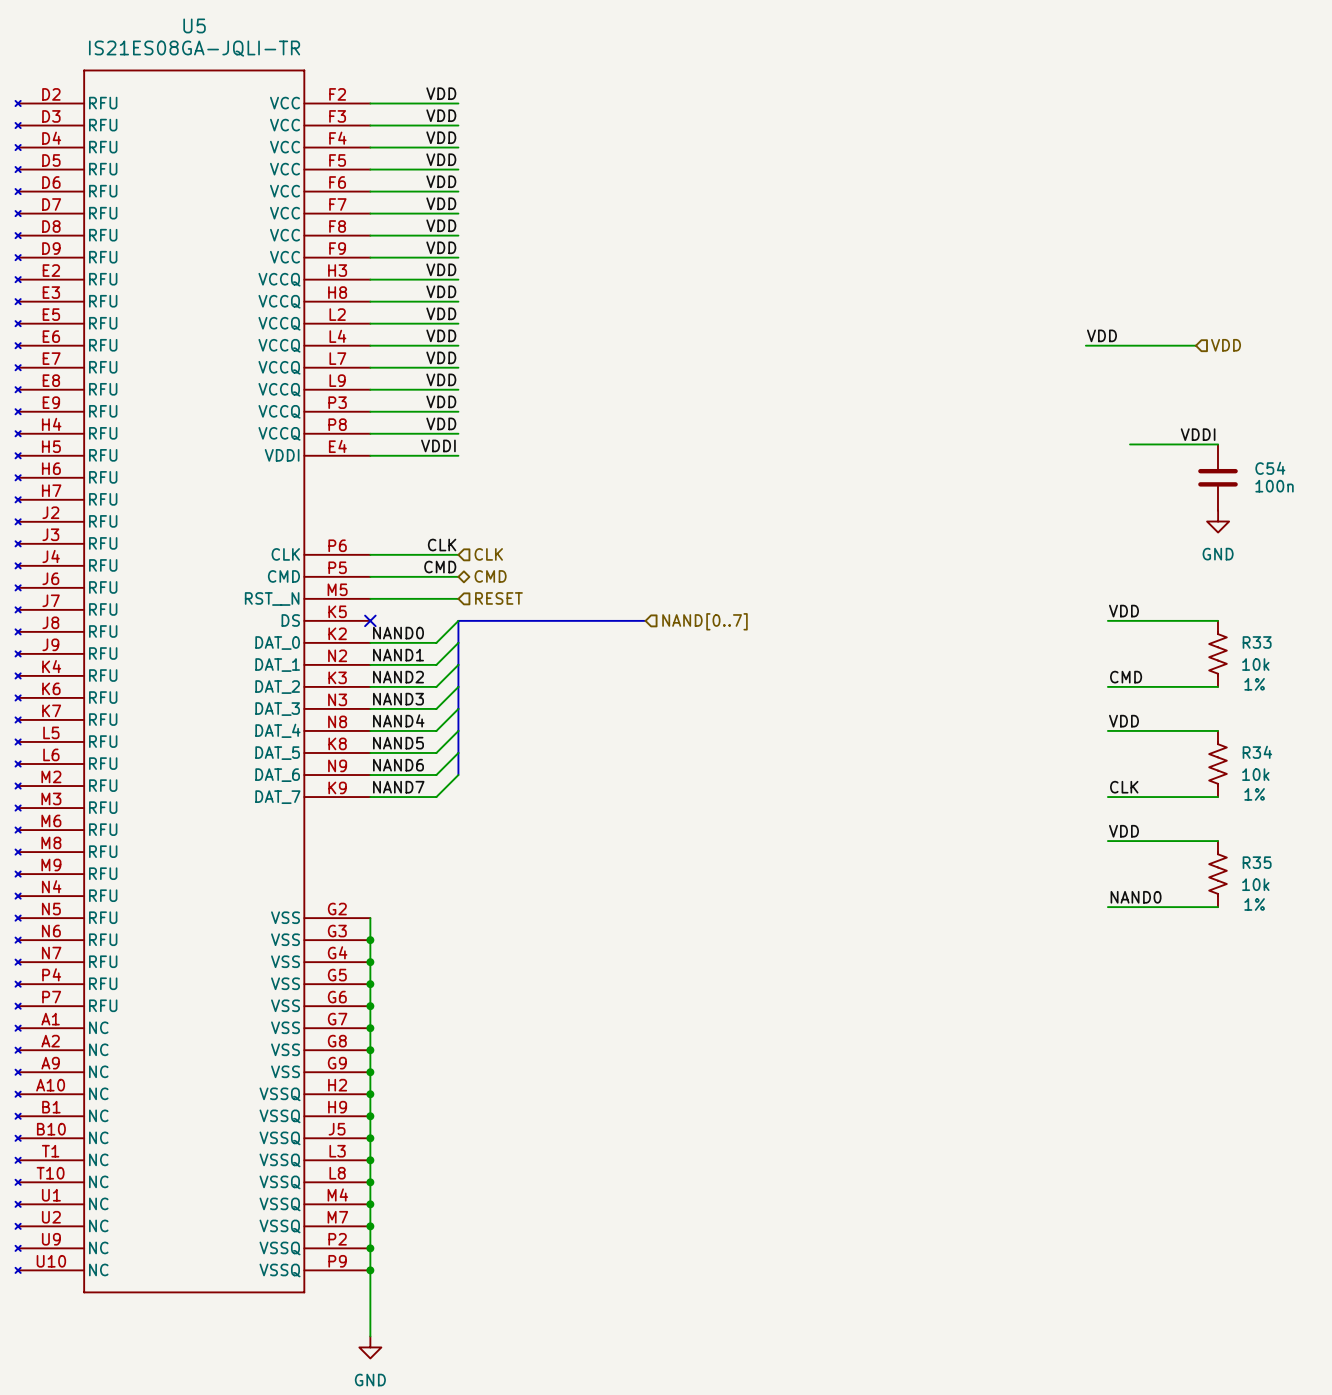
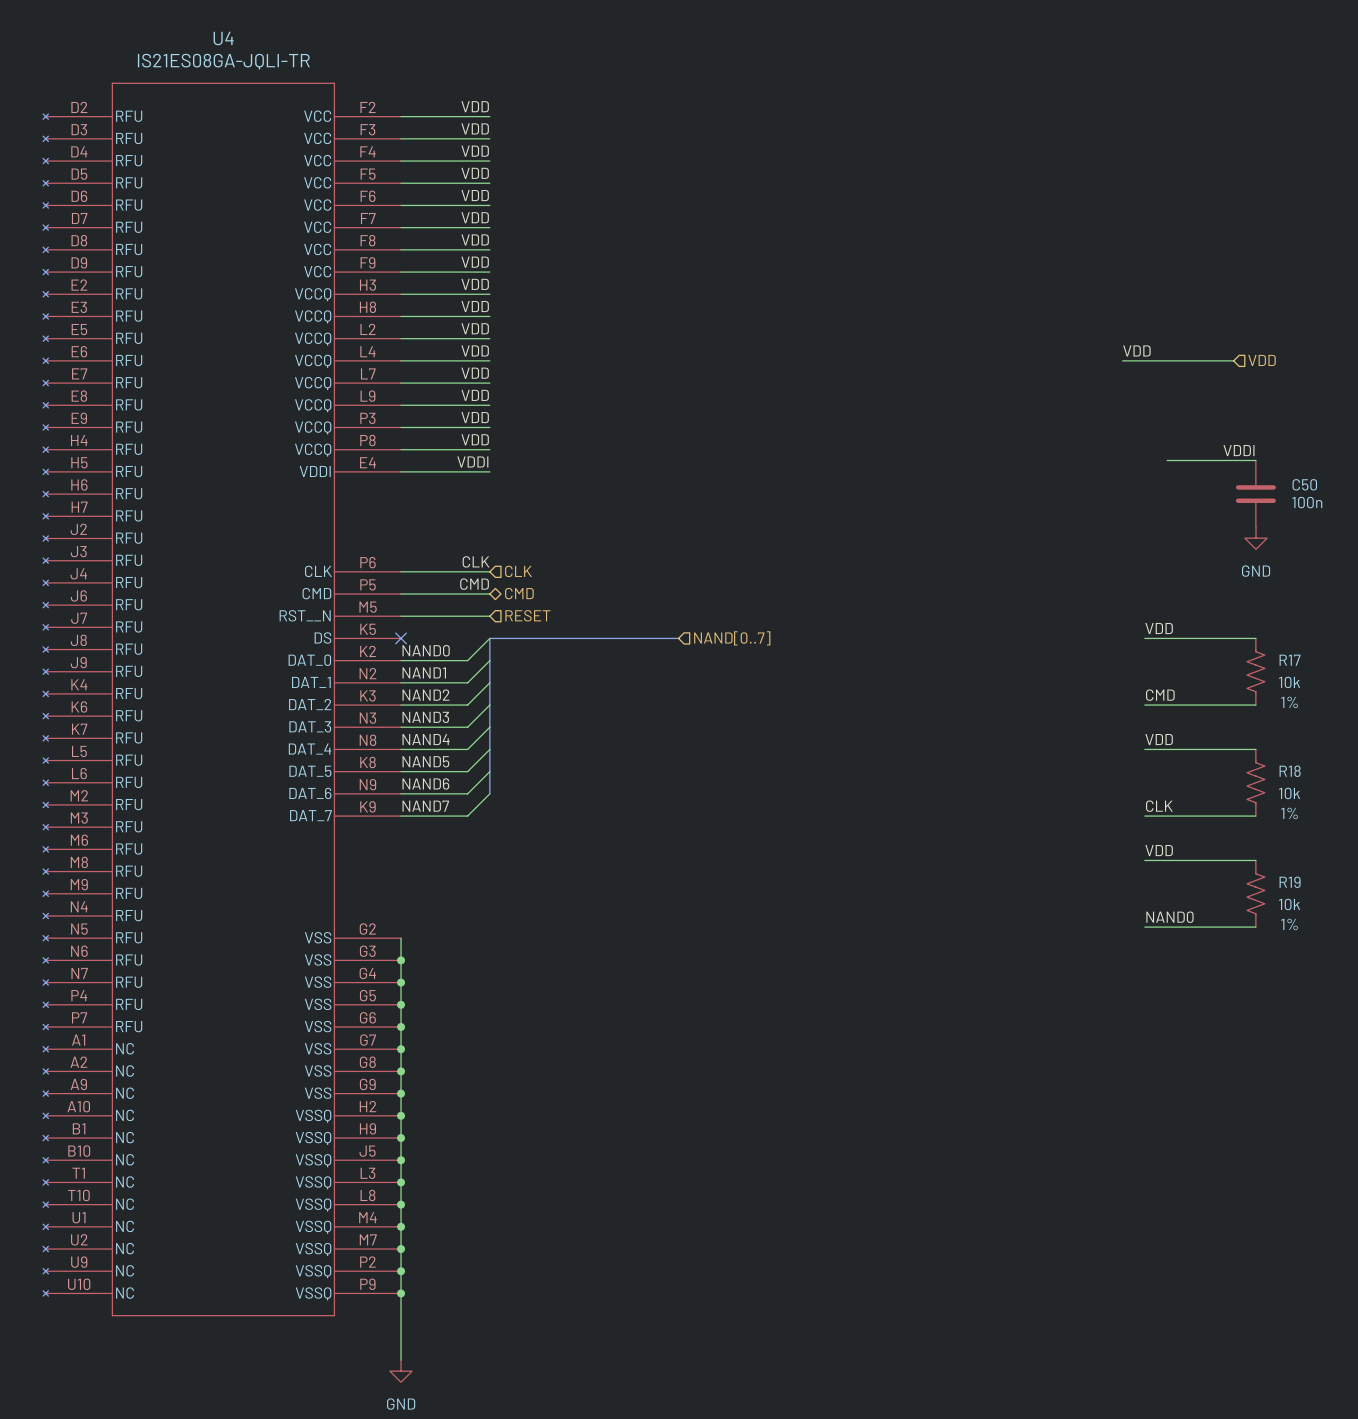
U5 name: U5 (194, 25) -> U4 (223, 38)
C54 name: C54 (1270, 468) -> C50 (1304, 484)
R33 name: R33 (1257, 642) -> R17 (1290, 660)
R34 name: R34 (1257, 752) -> R18 (1290, 771)
R35 name: R35 (1257, 862) -> R19 (1290, 882)

